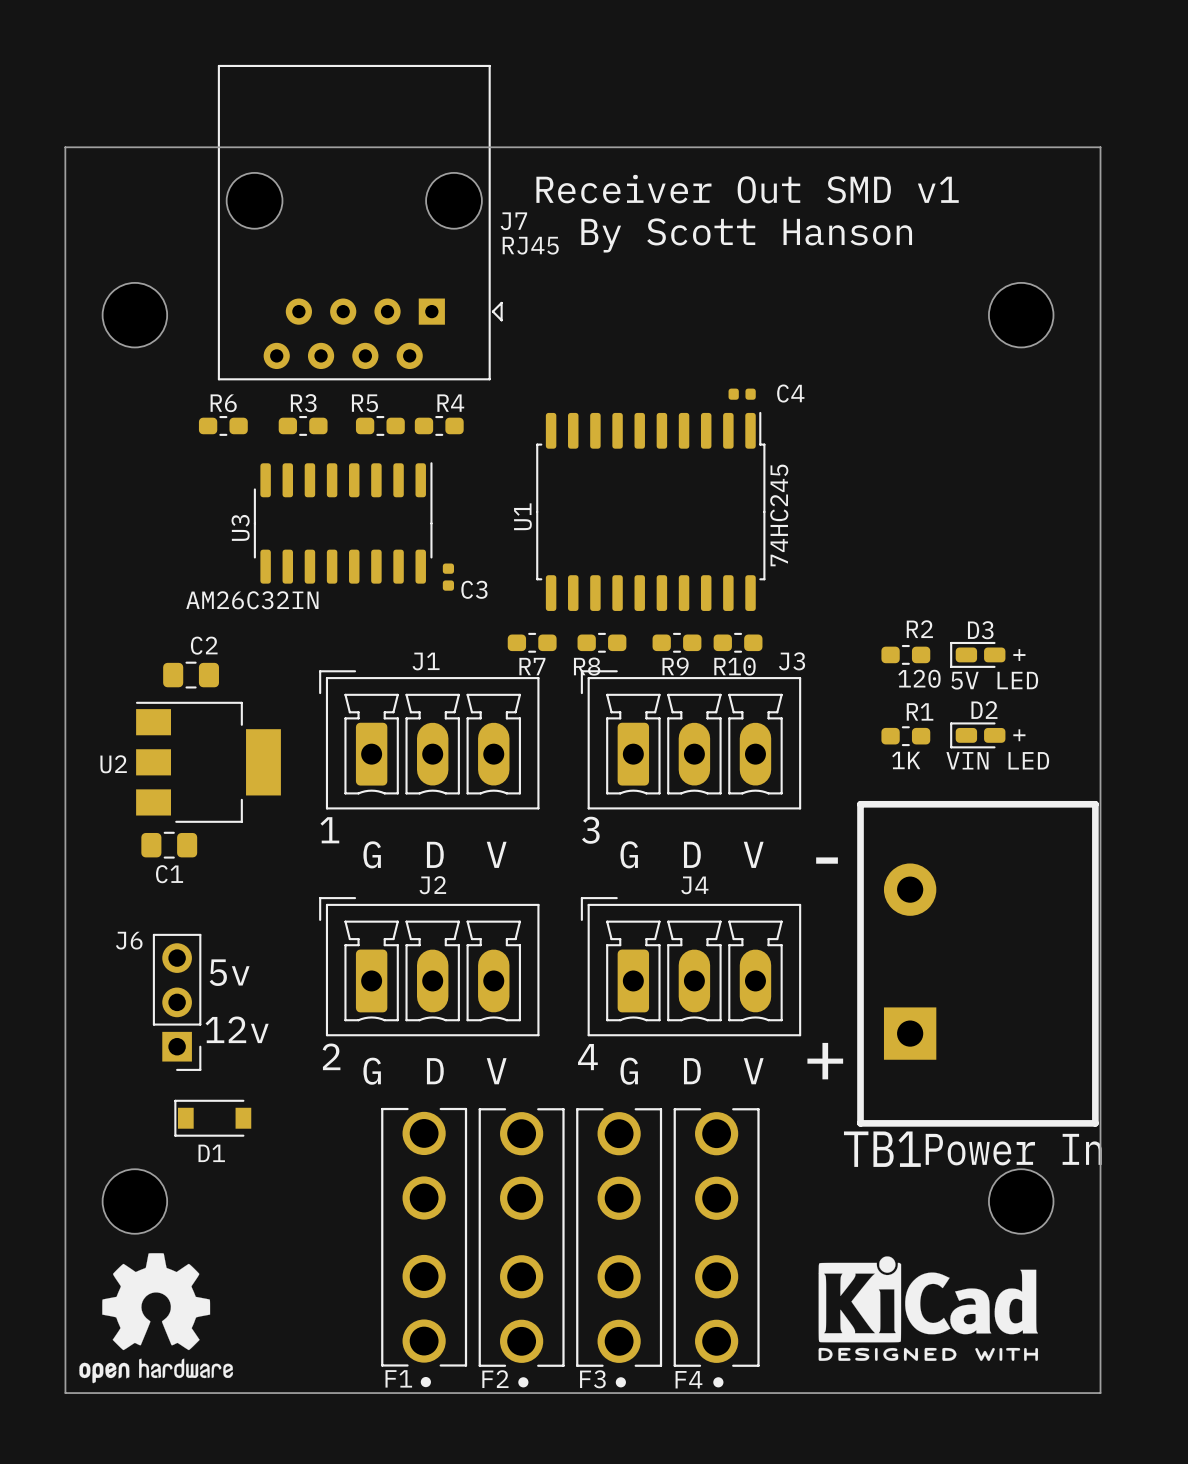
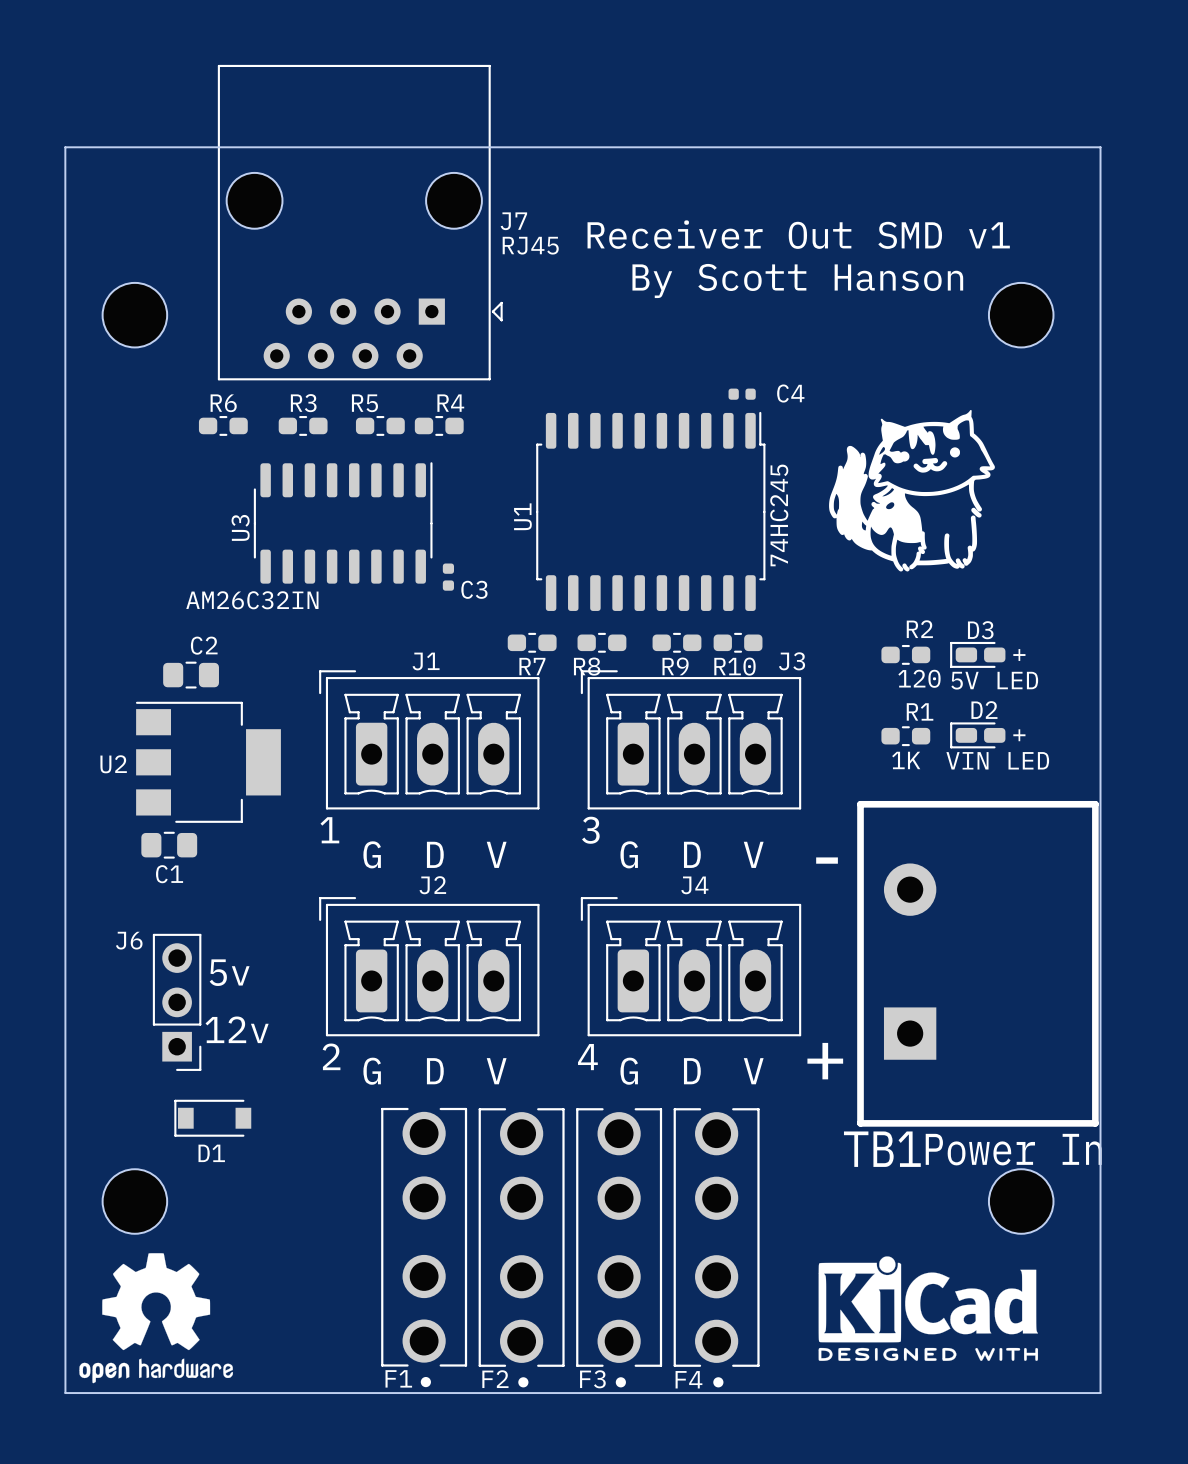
text position: Receiver Out SMD v1 (747, 189) -> Receiver Out SMD v1 (798, 234)
text position: By Scott Hanson (746, 235) -> By Scott Hanson (797, 280)
drawing: none -> [829, 409, 995, 572]

